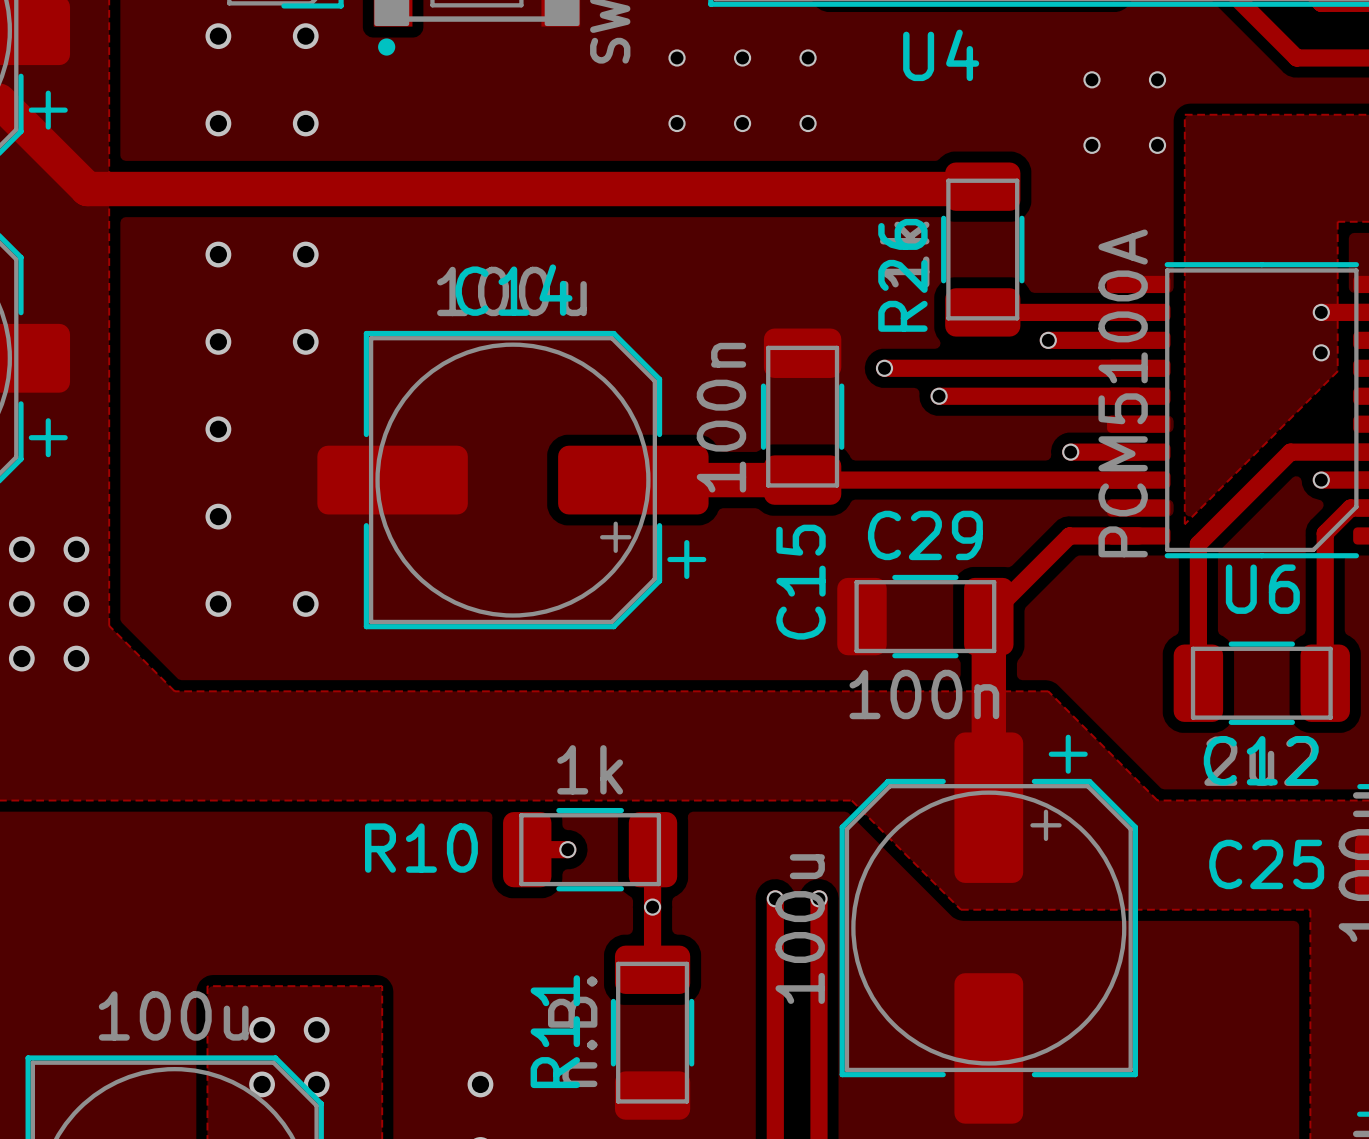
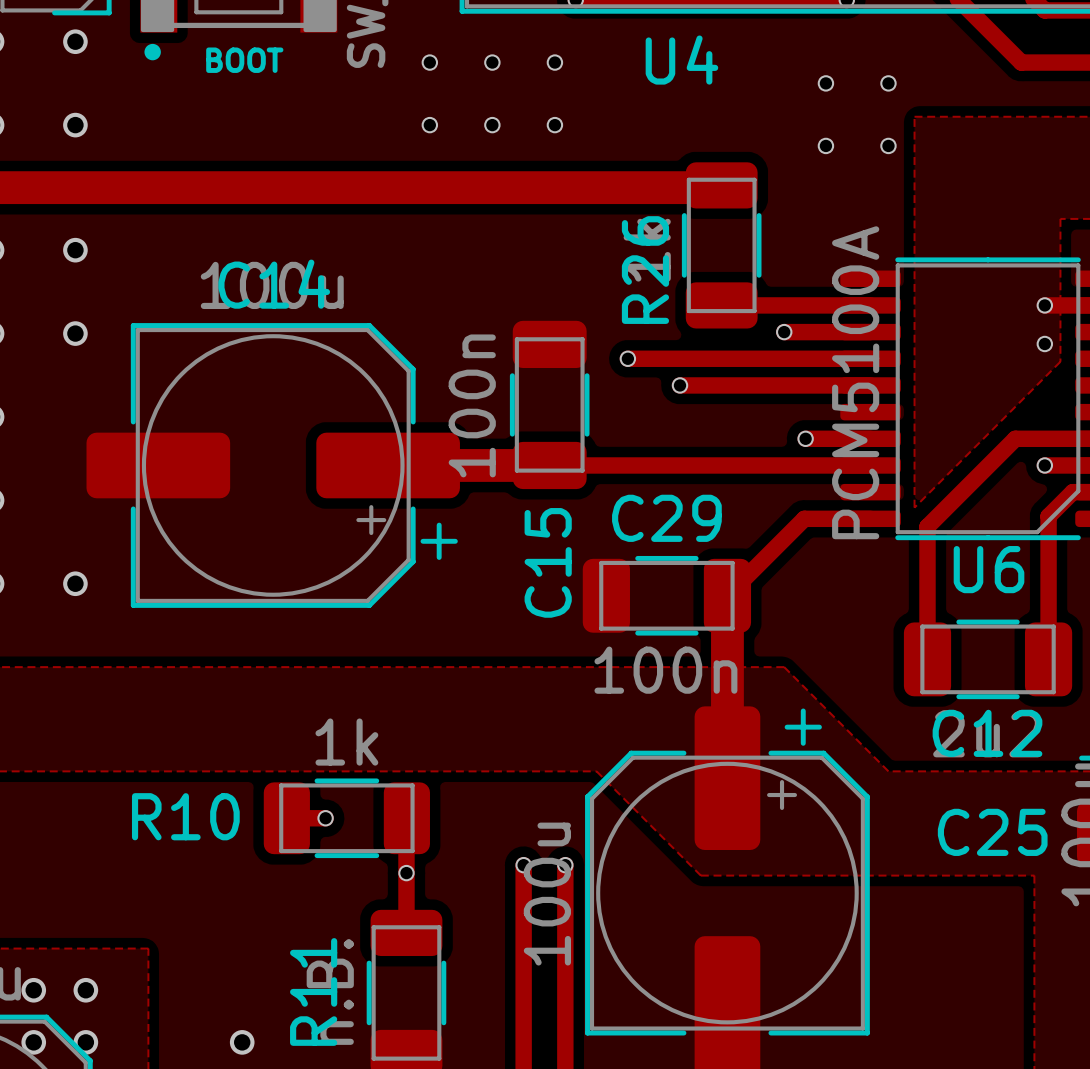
text: none -> BOOT (244, 60)

